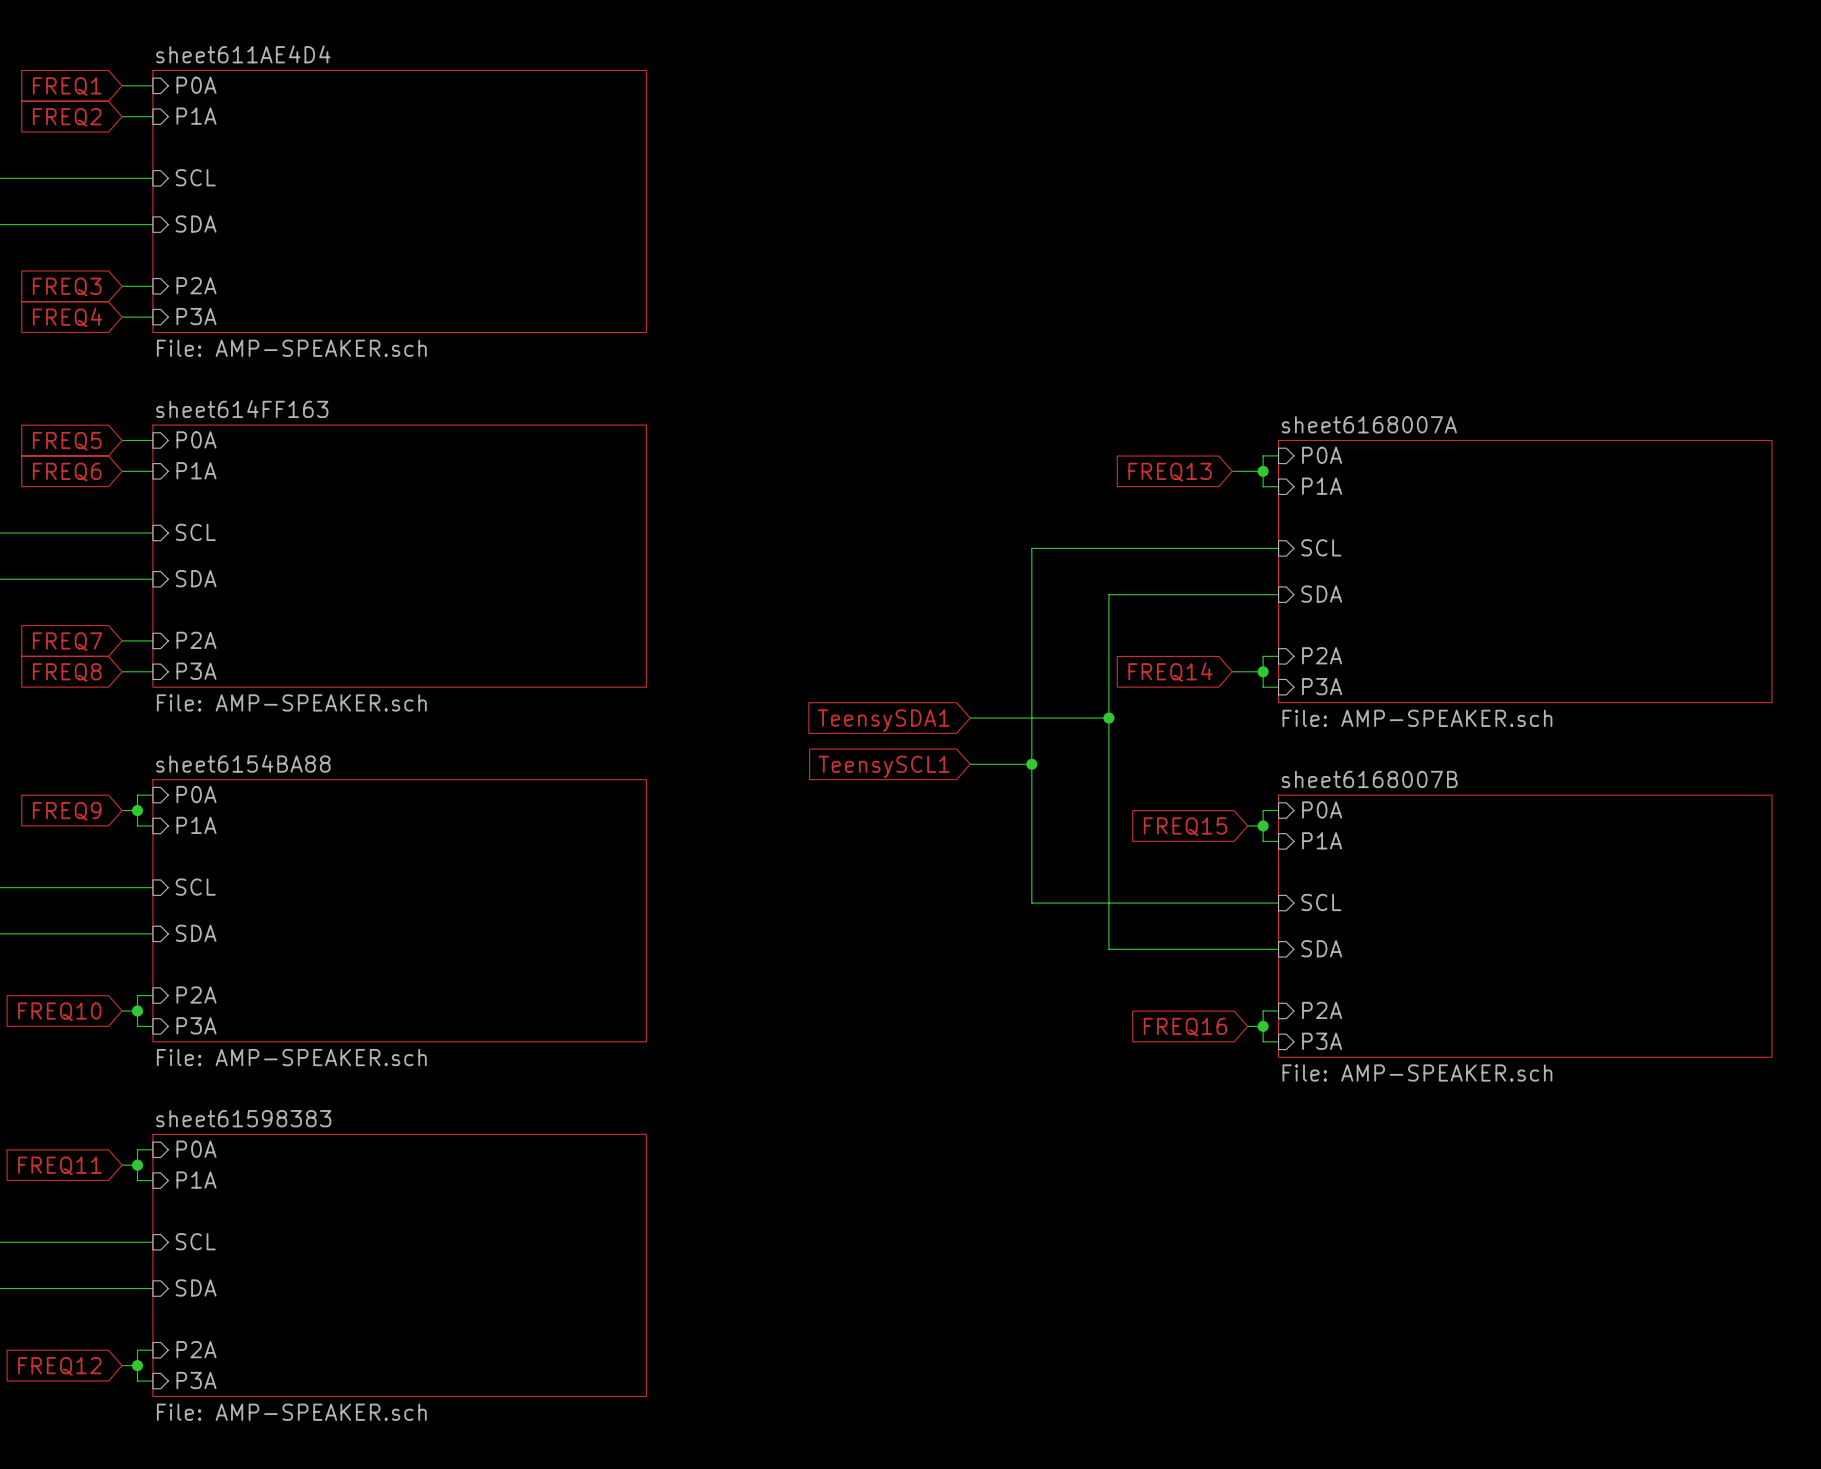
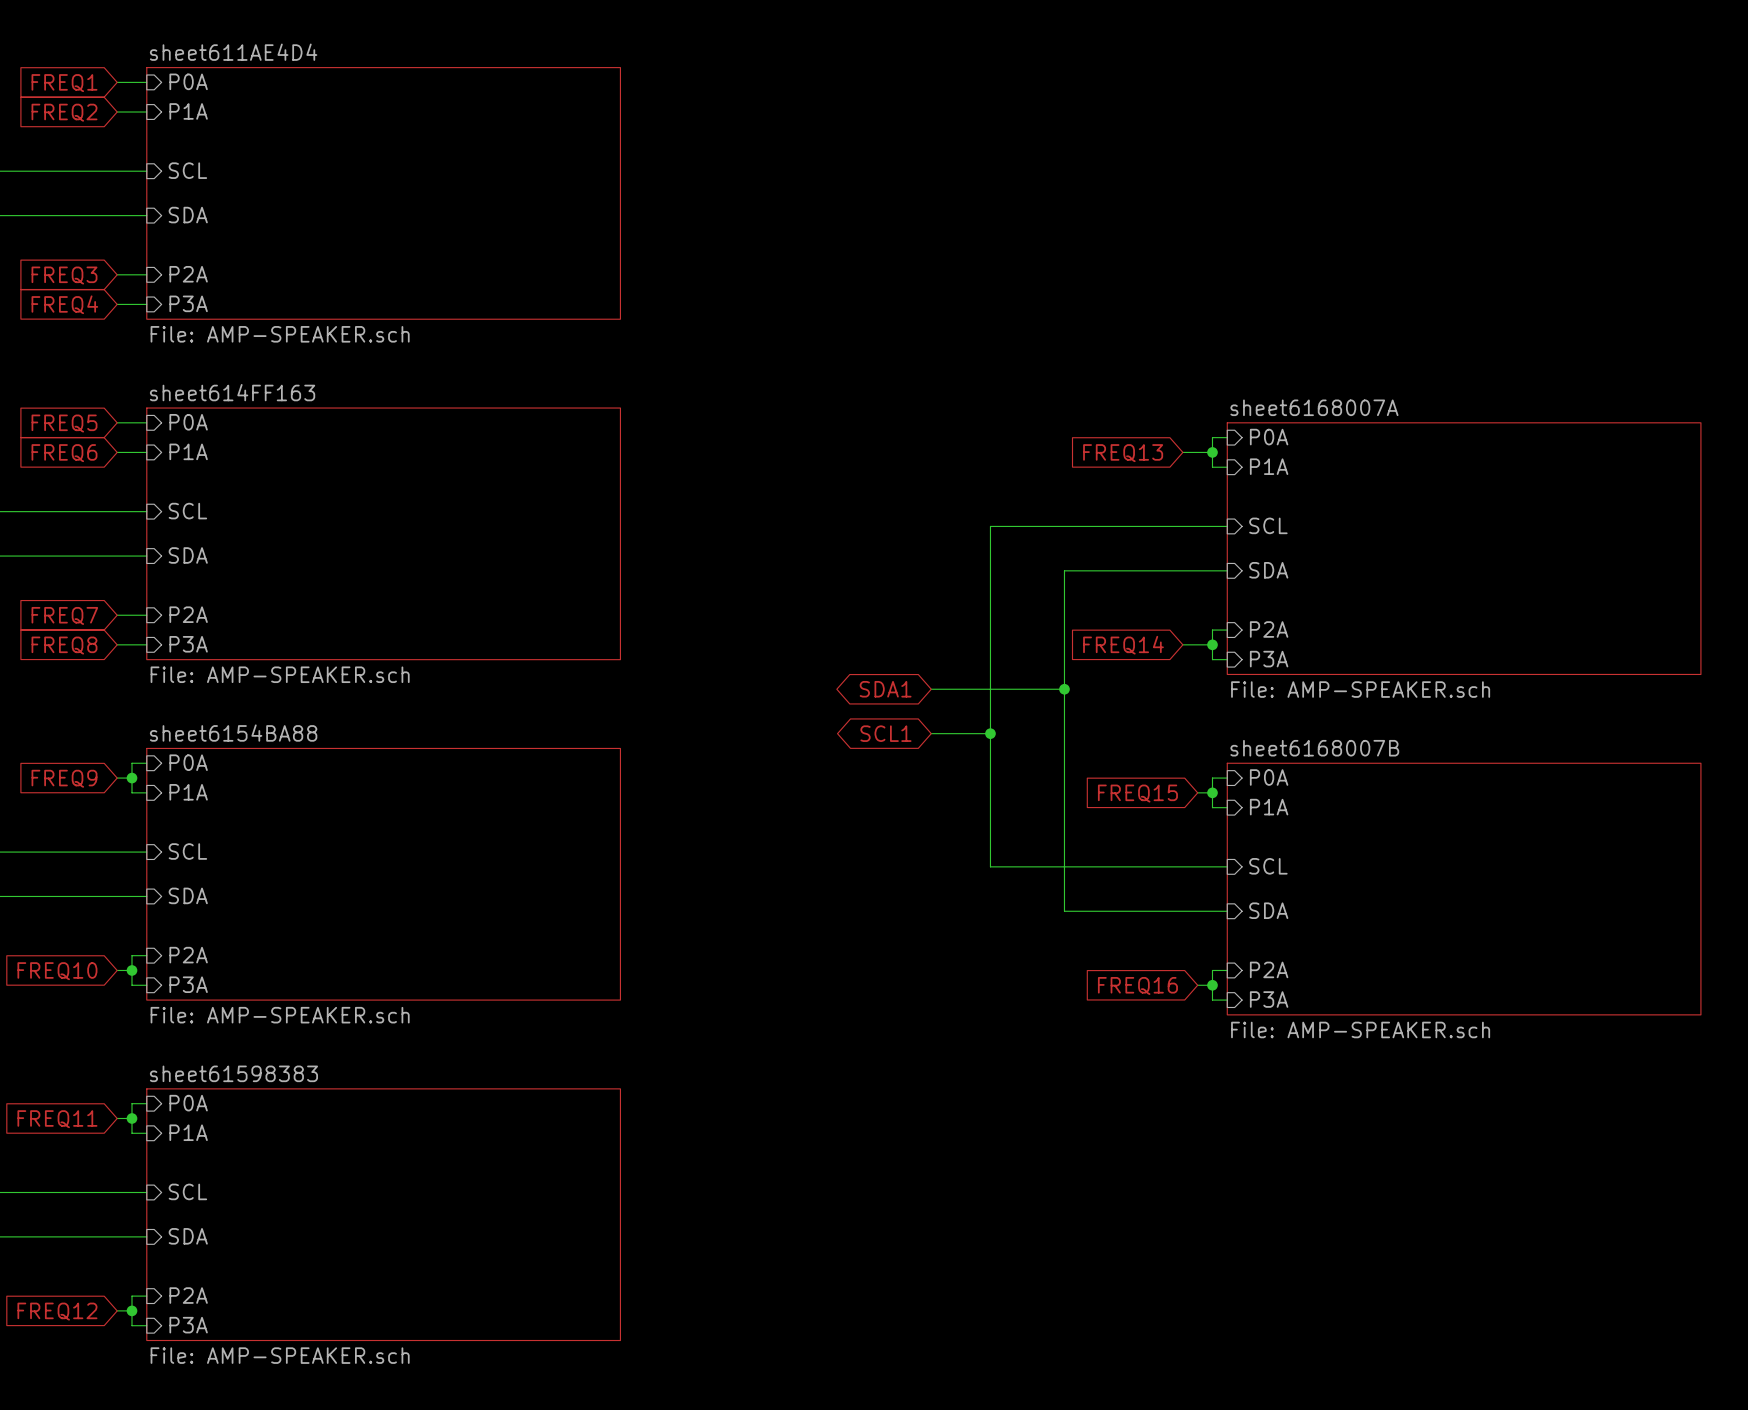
global label shape: input (883, 720) -> bidirectional (885, 689)
global label: TeensySDA1 (883, 720) -> SDA1 (885, 689)
global label shape: input (884, 766) -> bidirectional (885, 733)
global label: TeensySCL1 (884, 766) -> SCL1 (885, 733)

